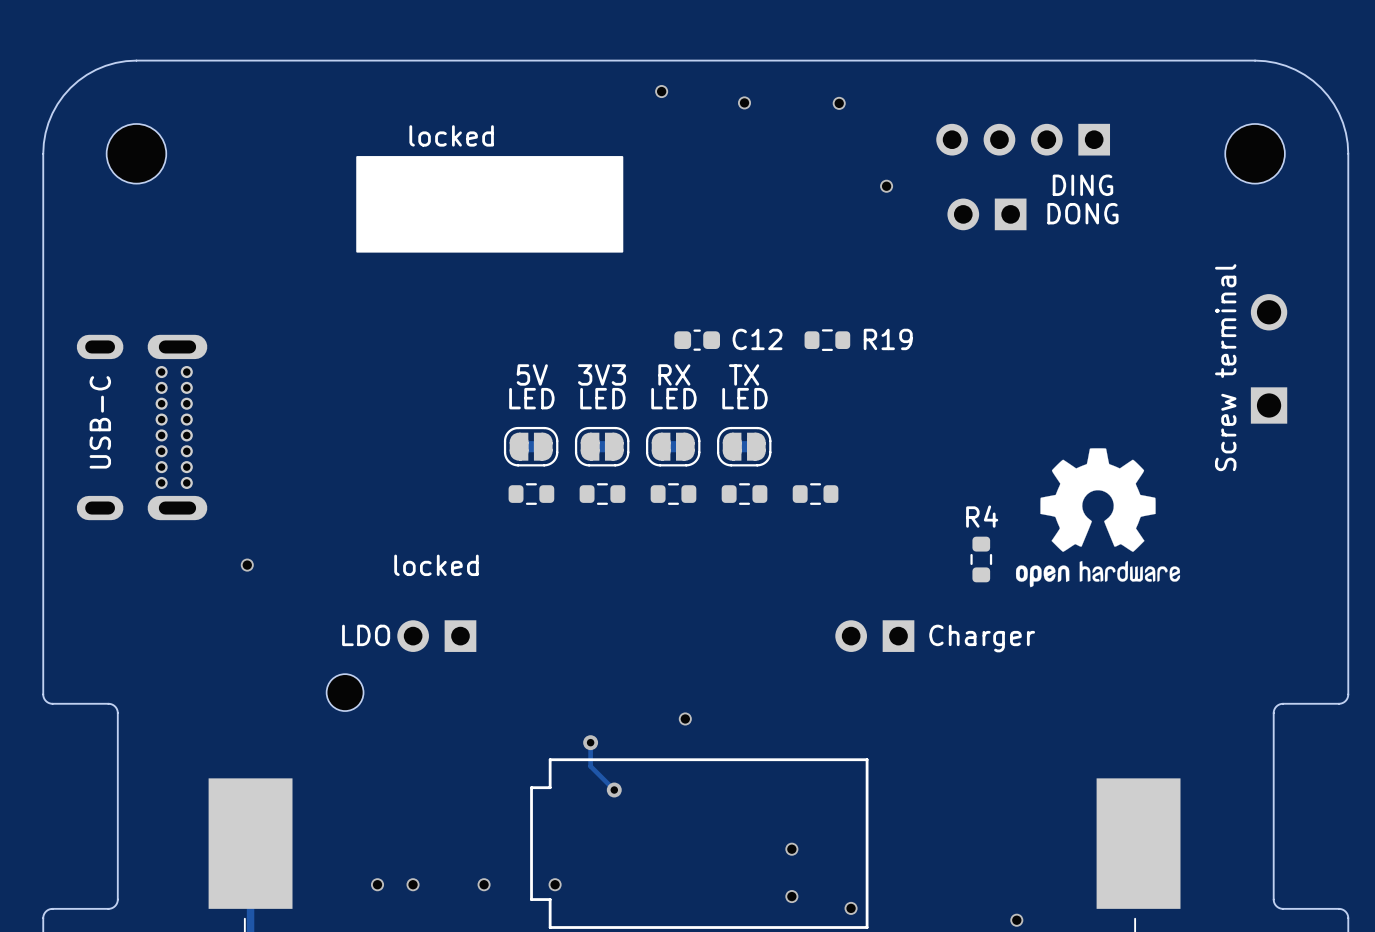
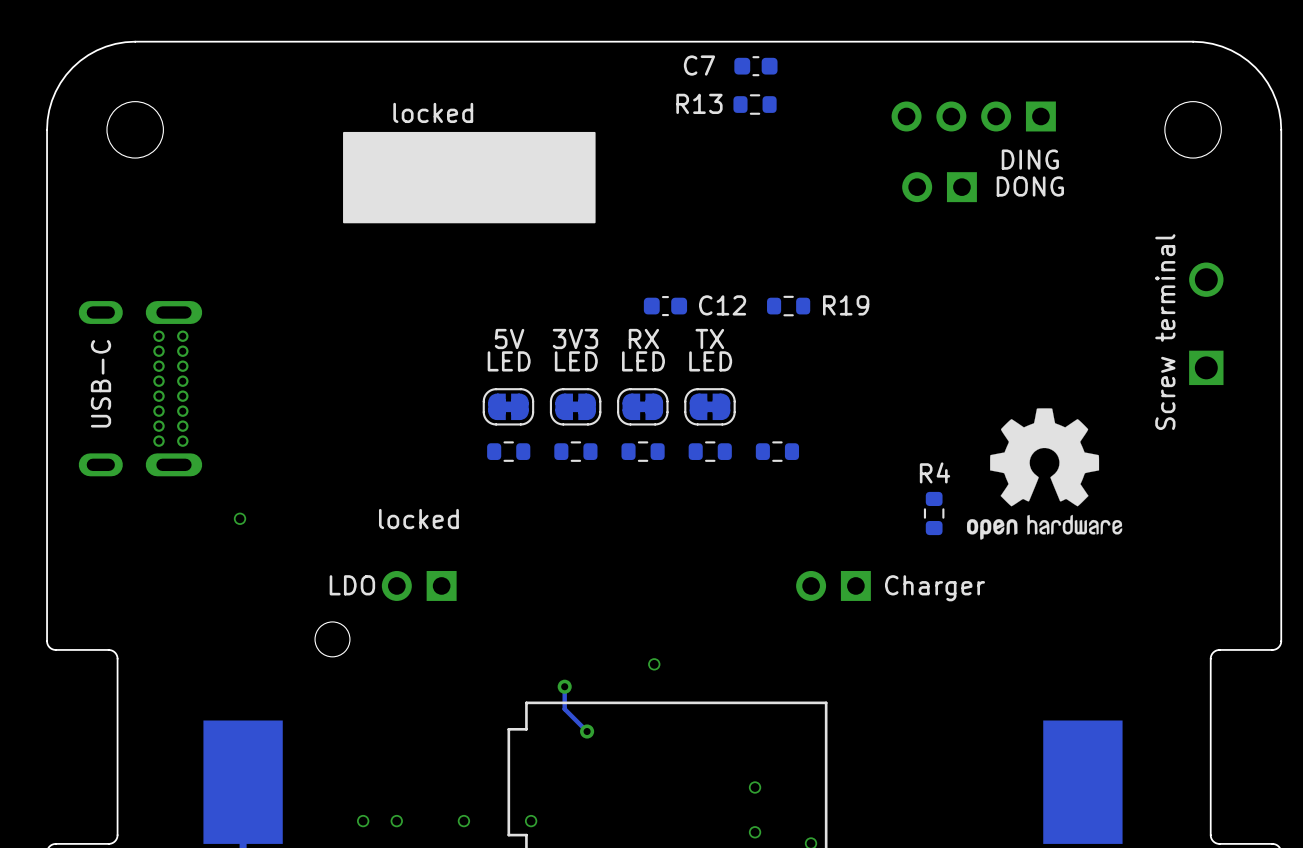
C7: none -> (755, 66)
via: (661, 91) -> none
via: (744, 102) -> none
via: (839, 103) -> none
R13: none -> (755, 104)
via: (886, 186) -> none

